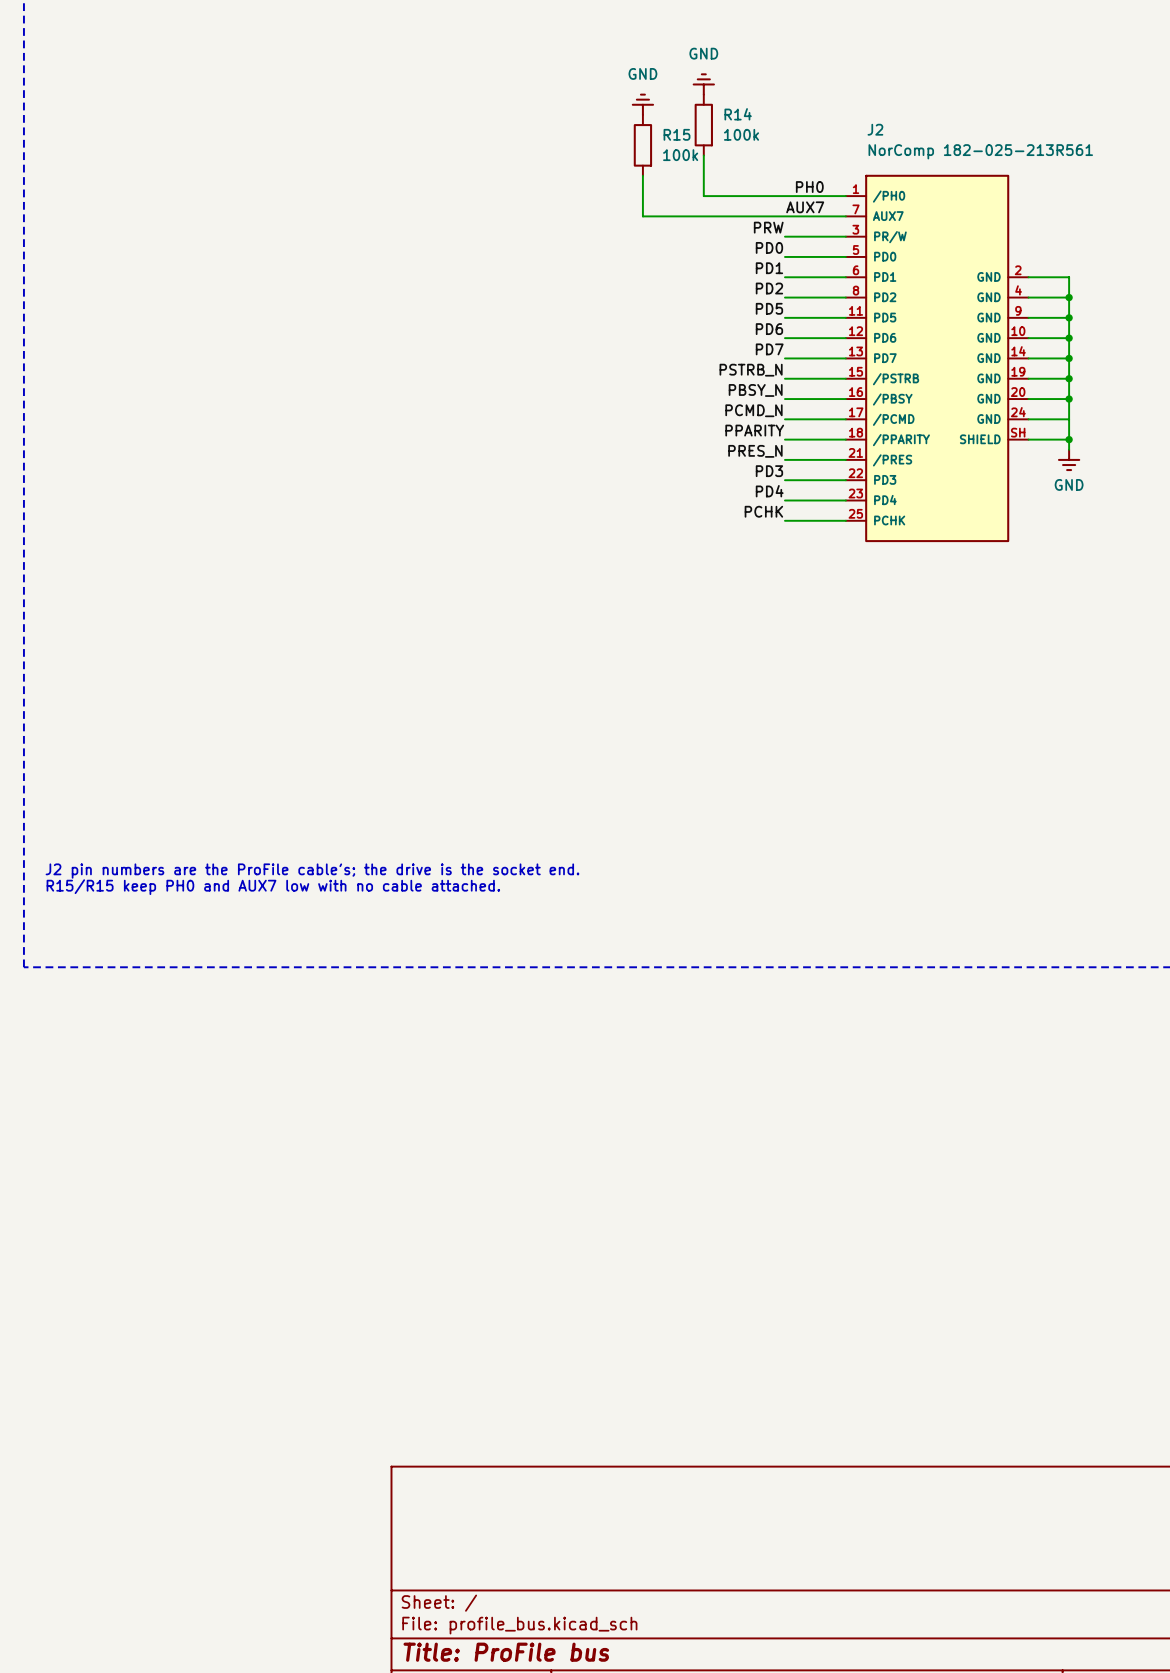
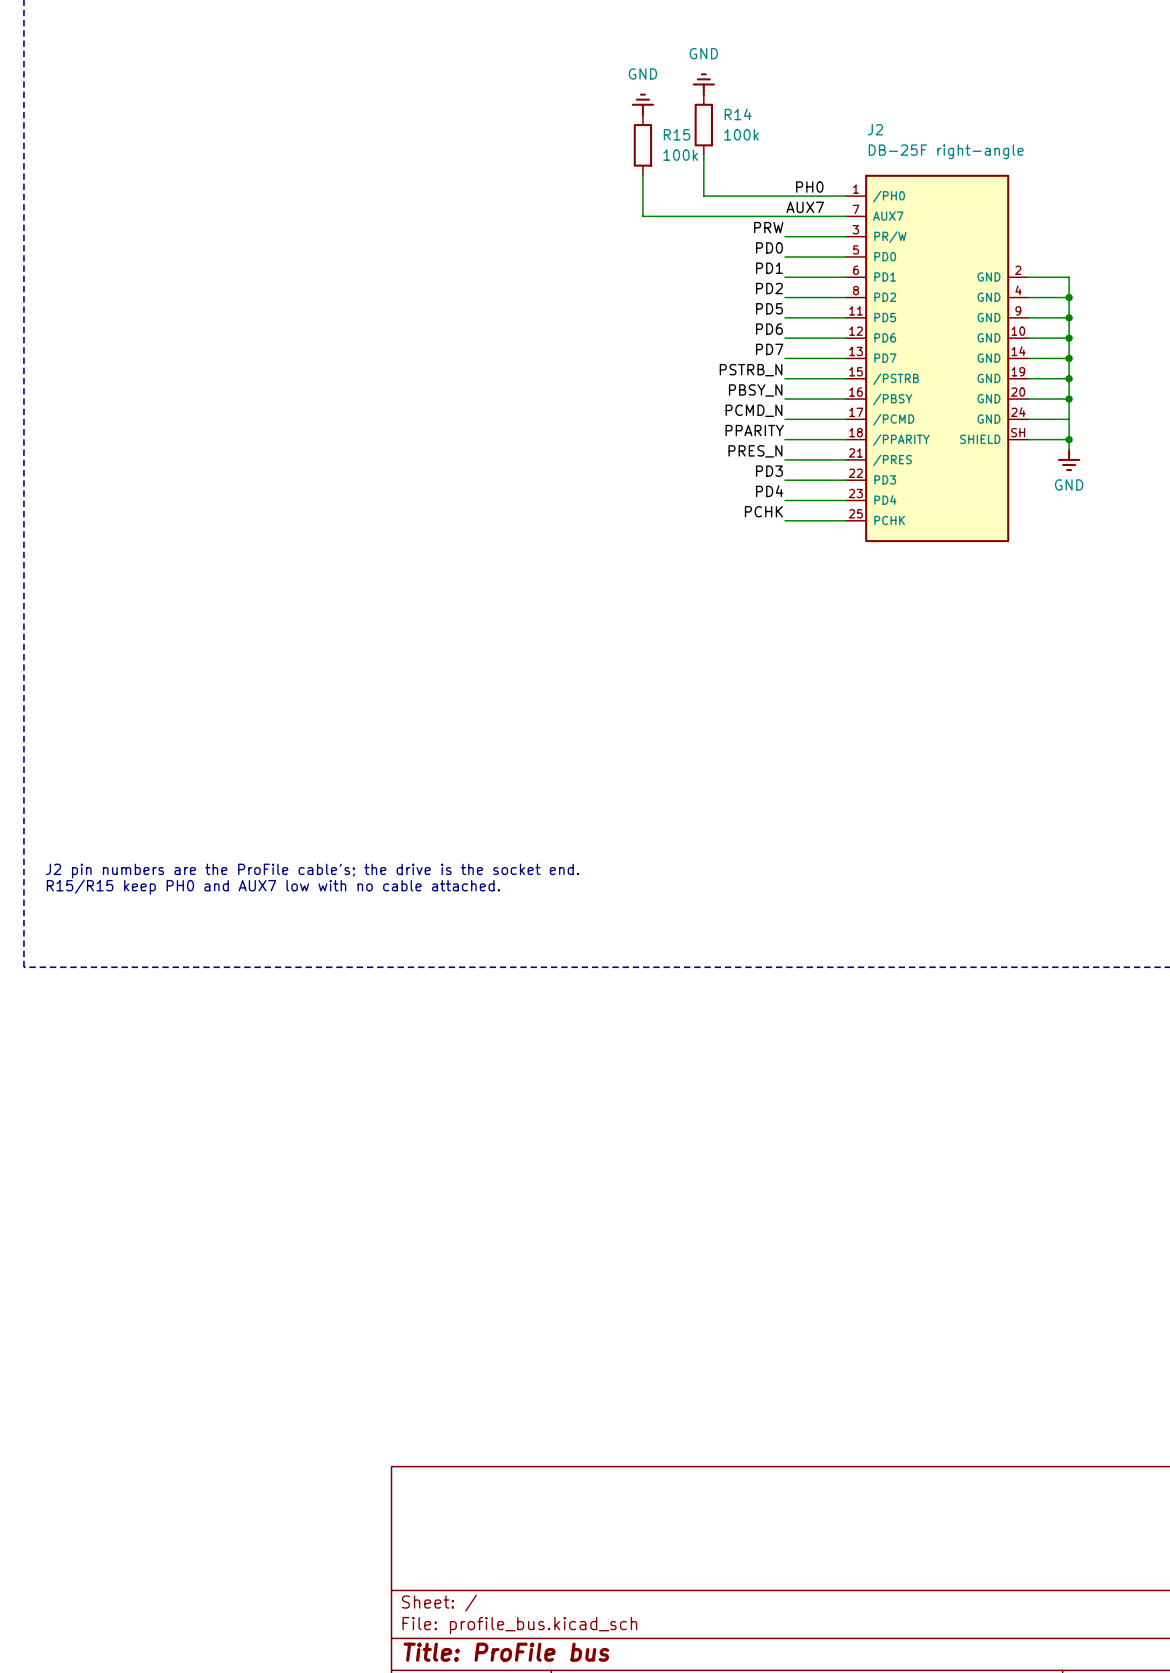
J2 value: NorComp 182-025-213R561 (980, 151) -> DB-25F right-angle (946, 151)

